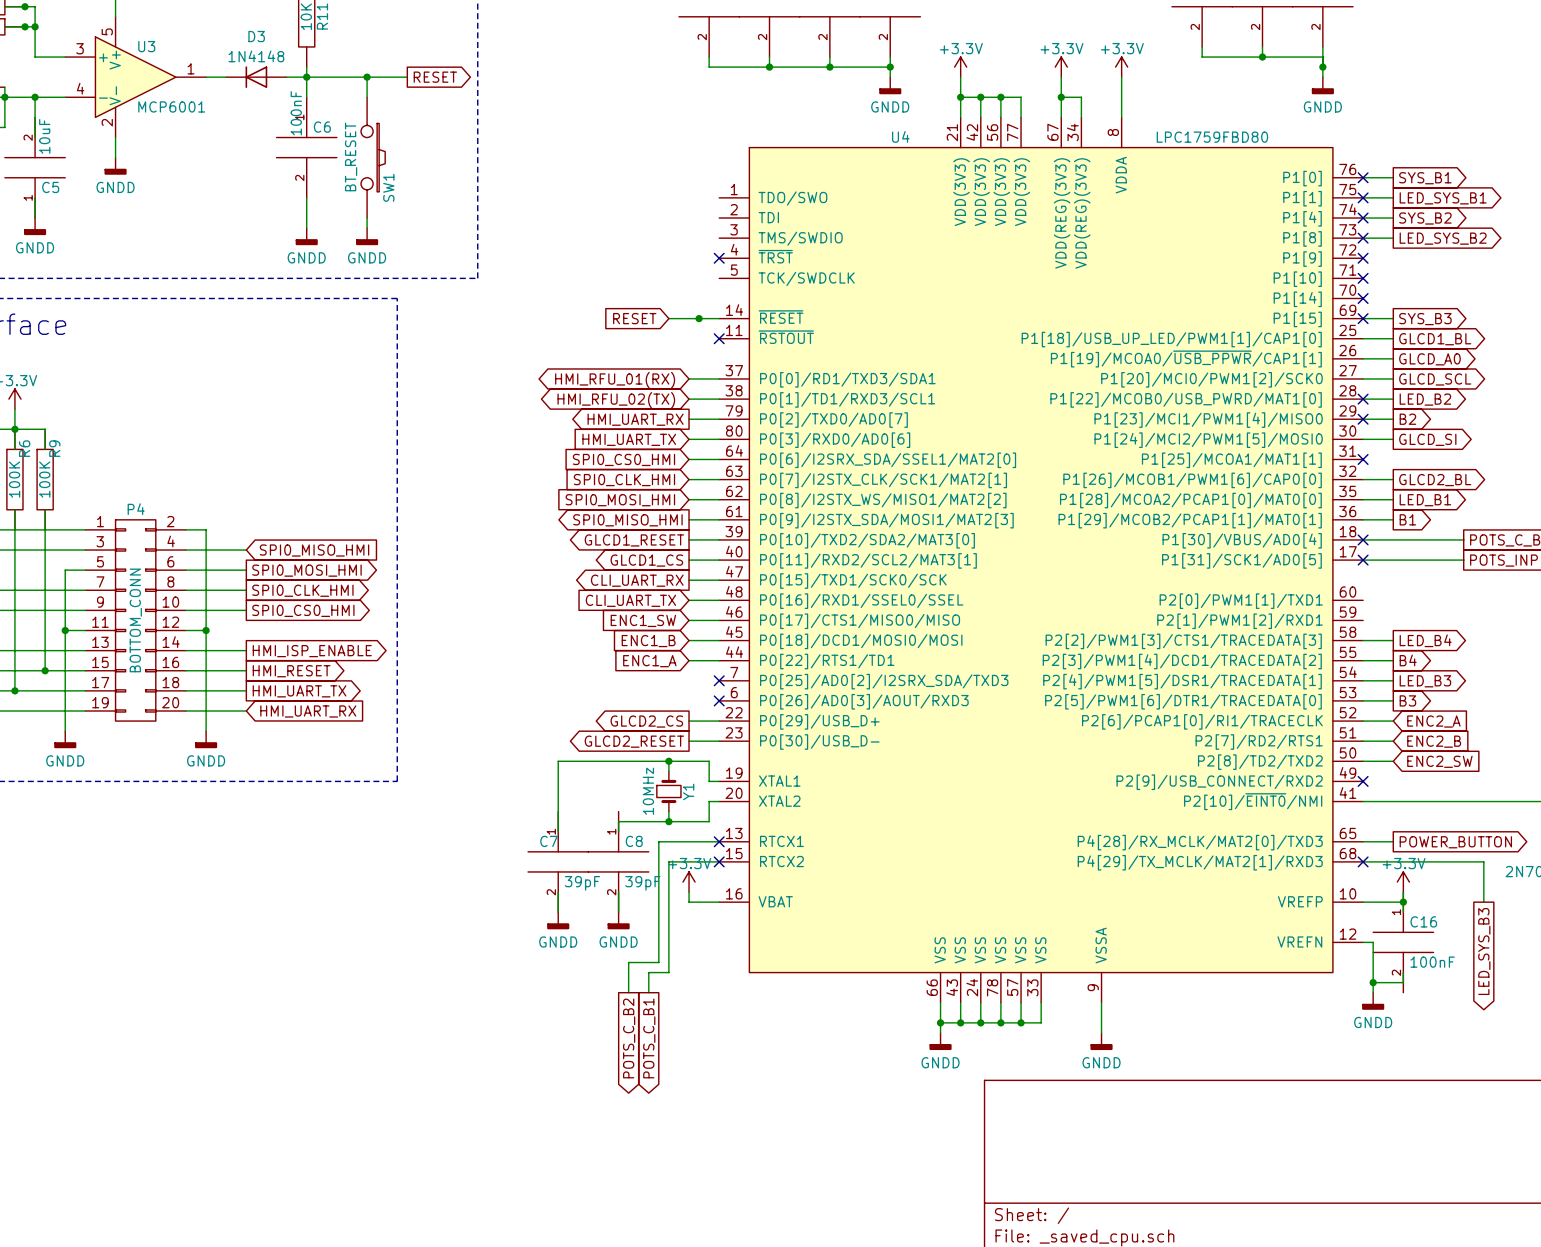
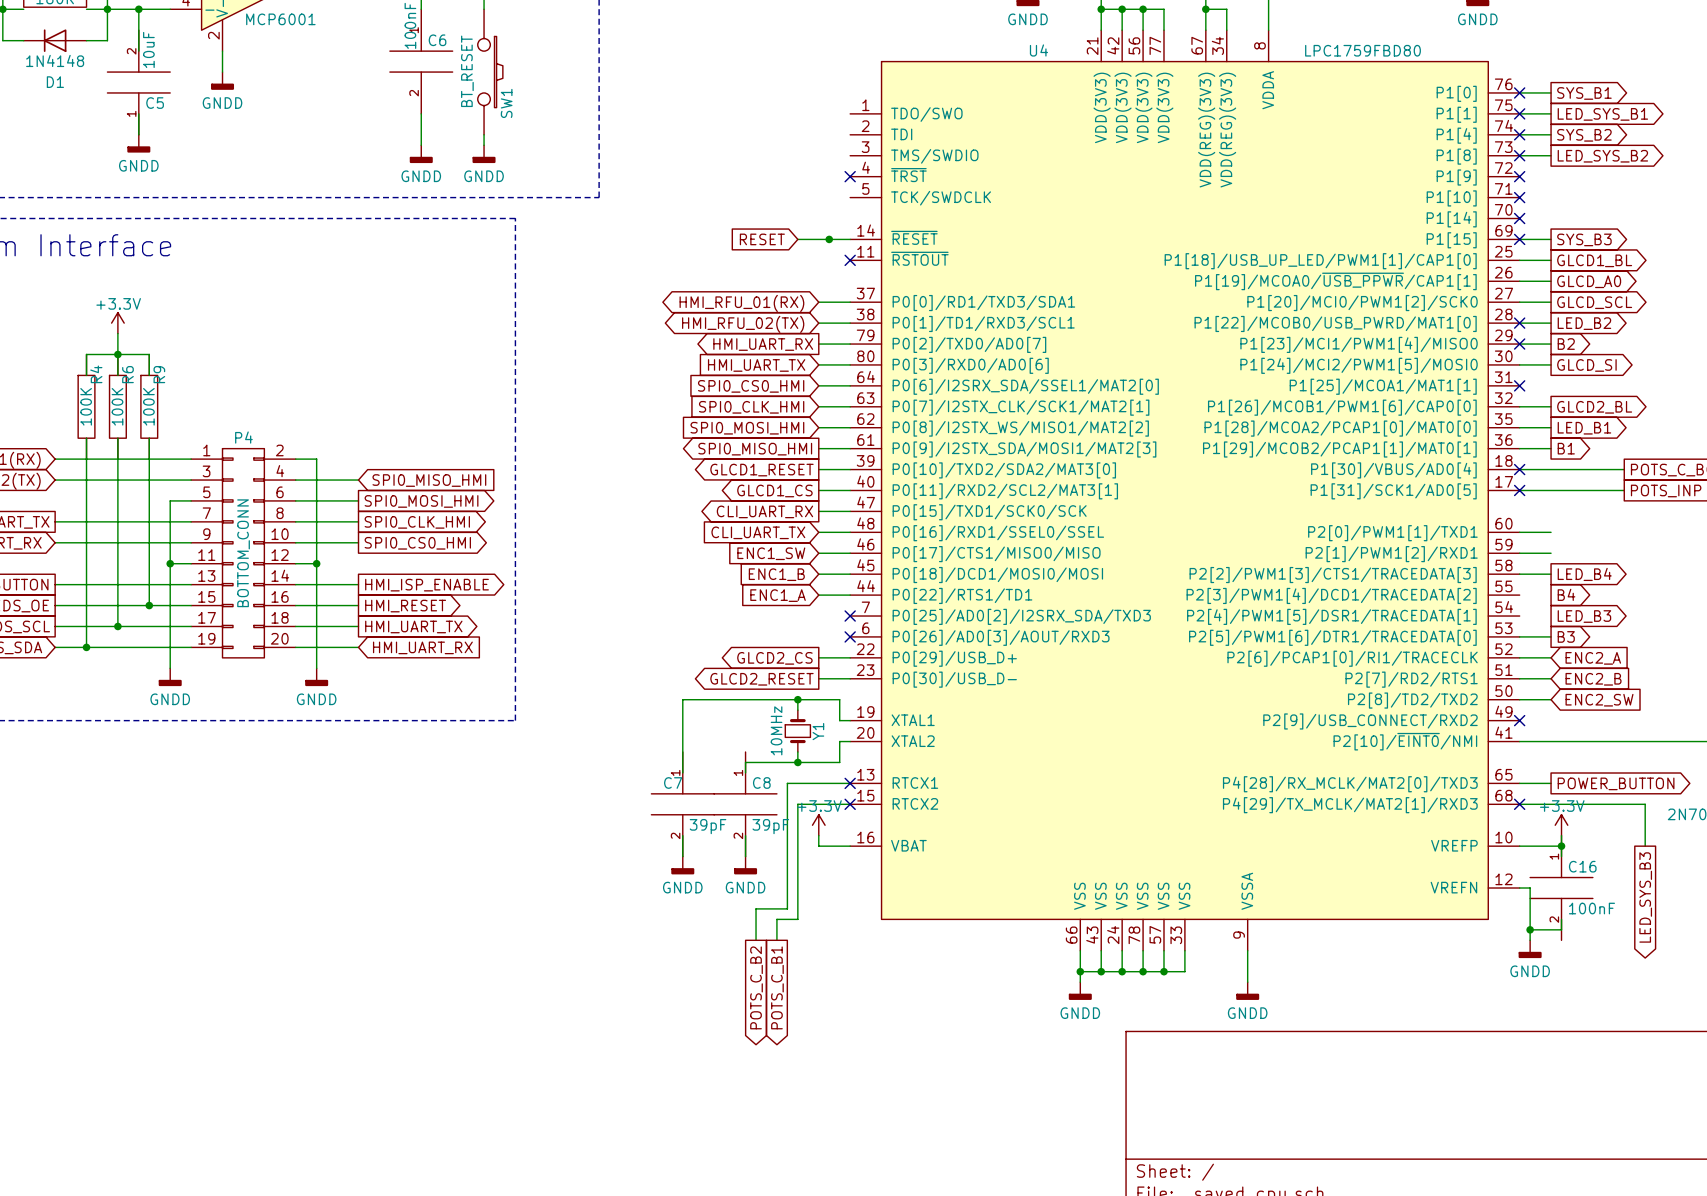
wire: (1363, 660) (1393, 660) -> (1519, 532) (1551, 532)
wire: (1363, 680) (1393, 680) -> (1519, 553) (1551, 553)

